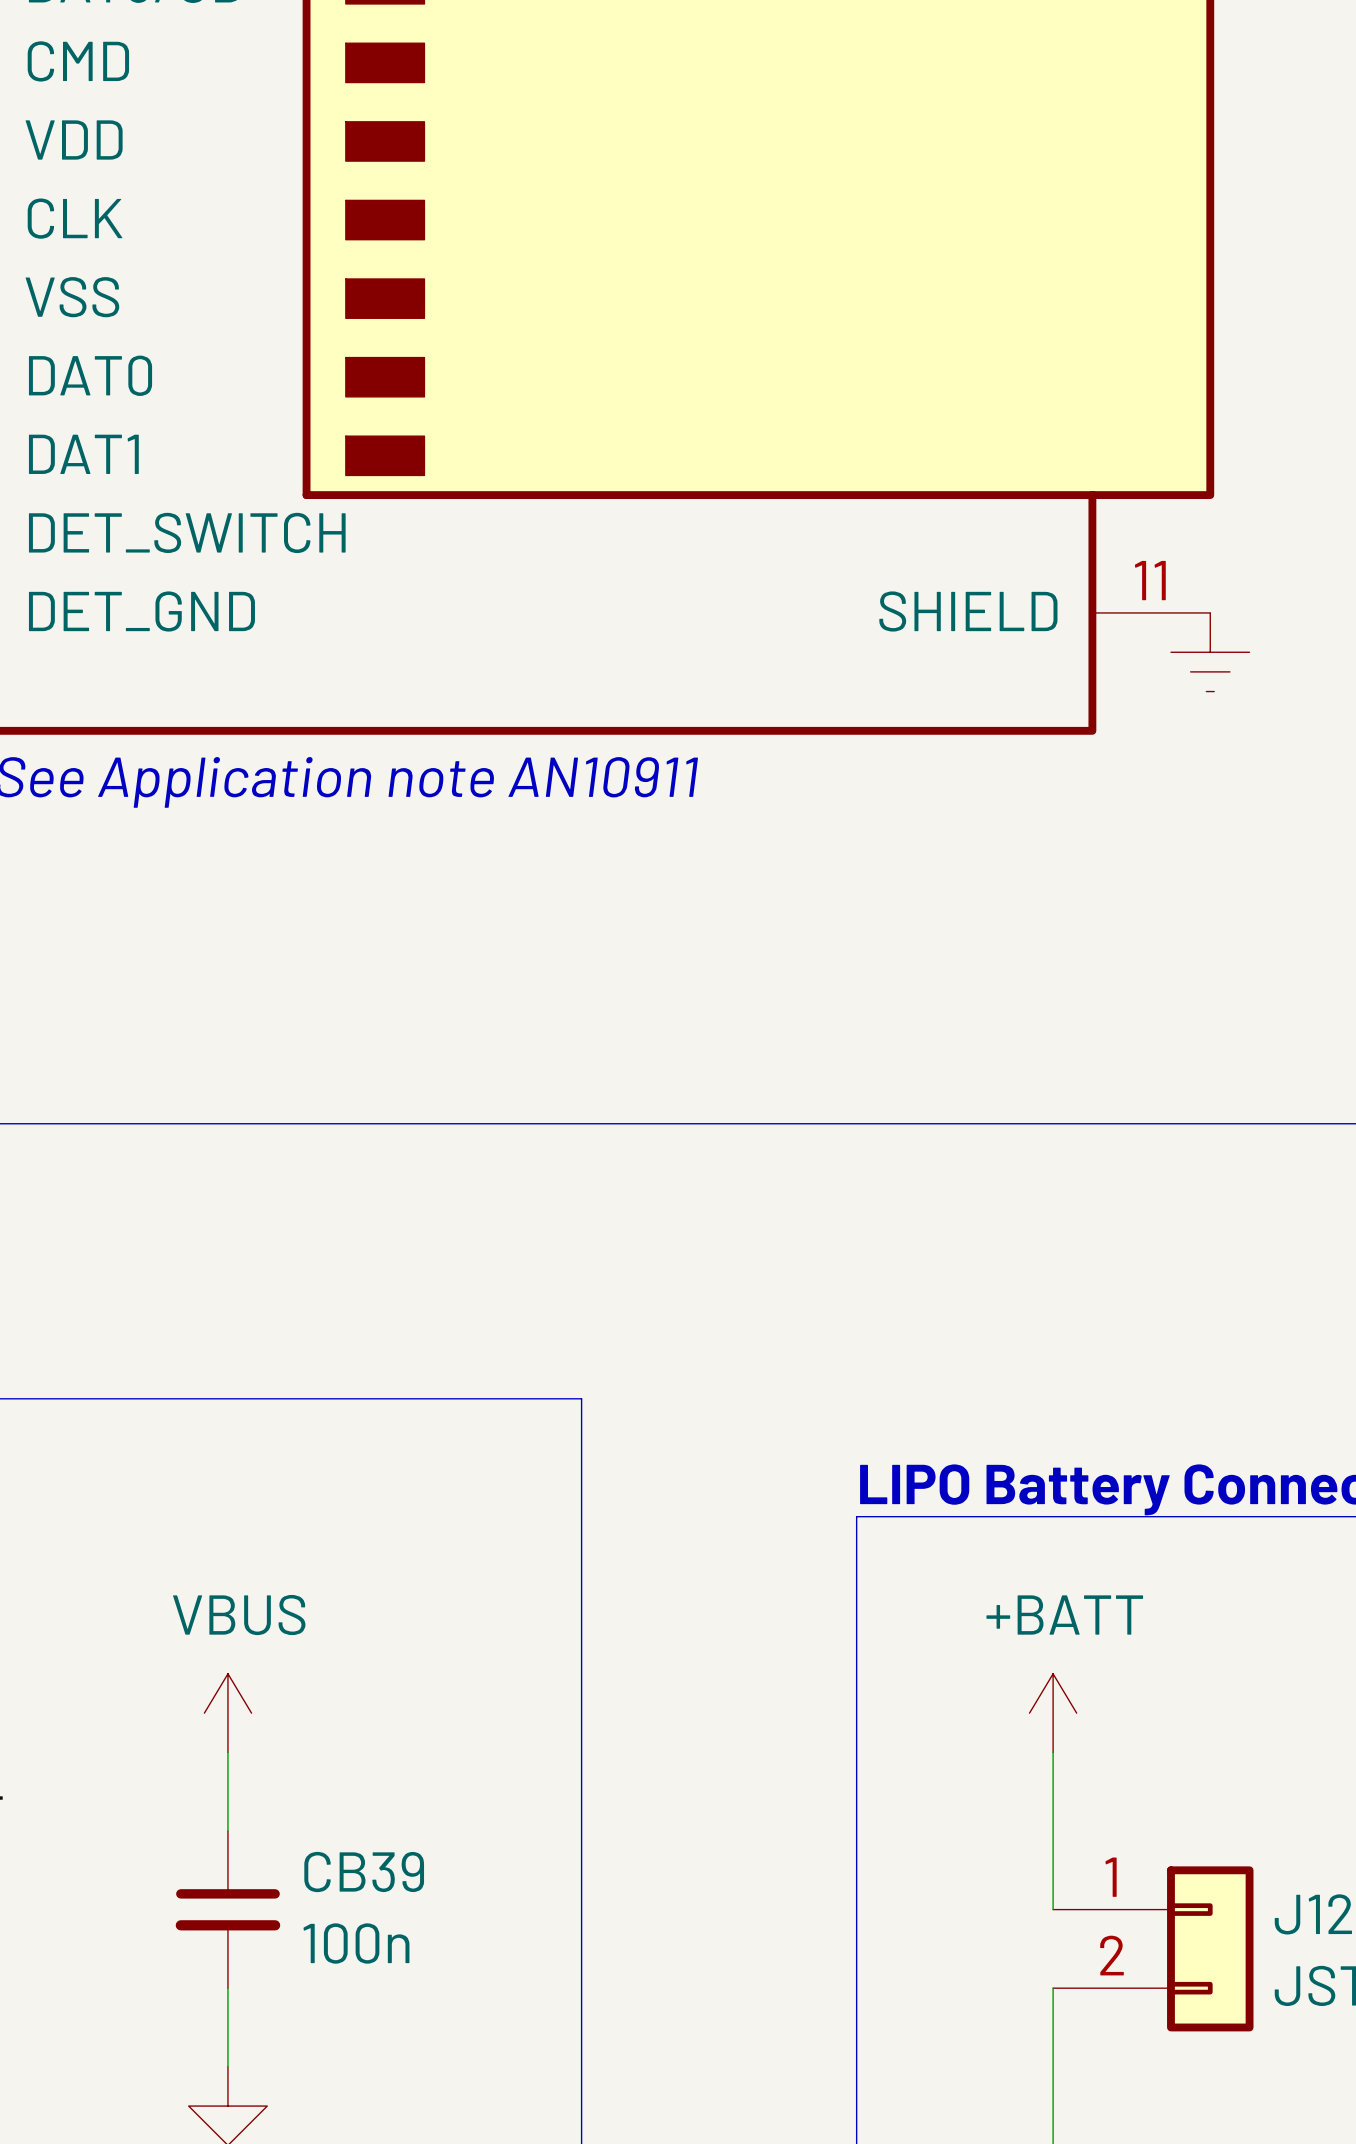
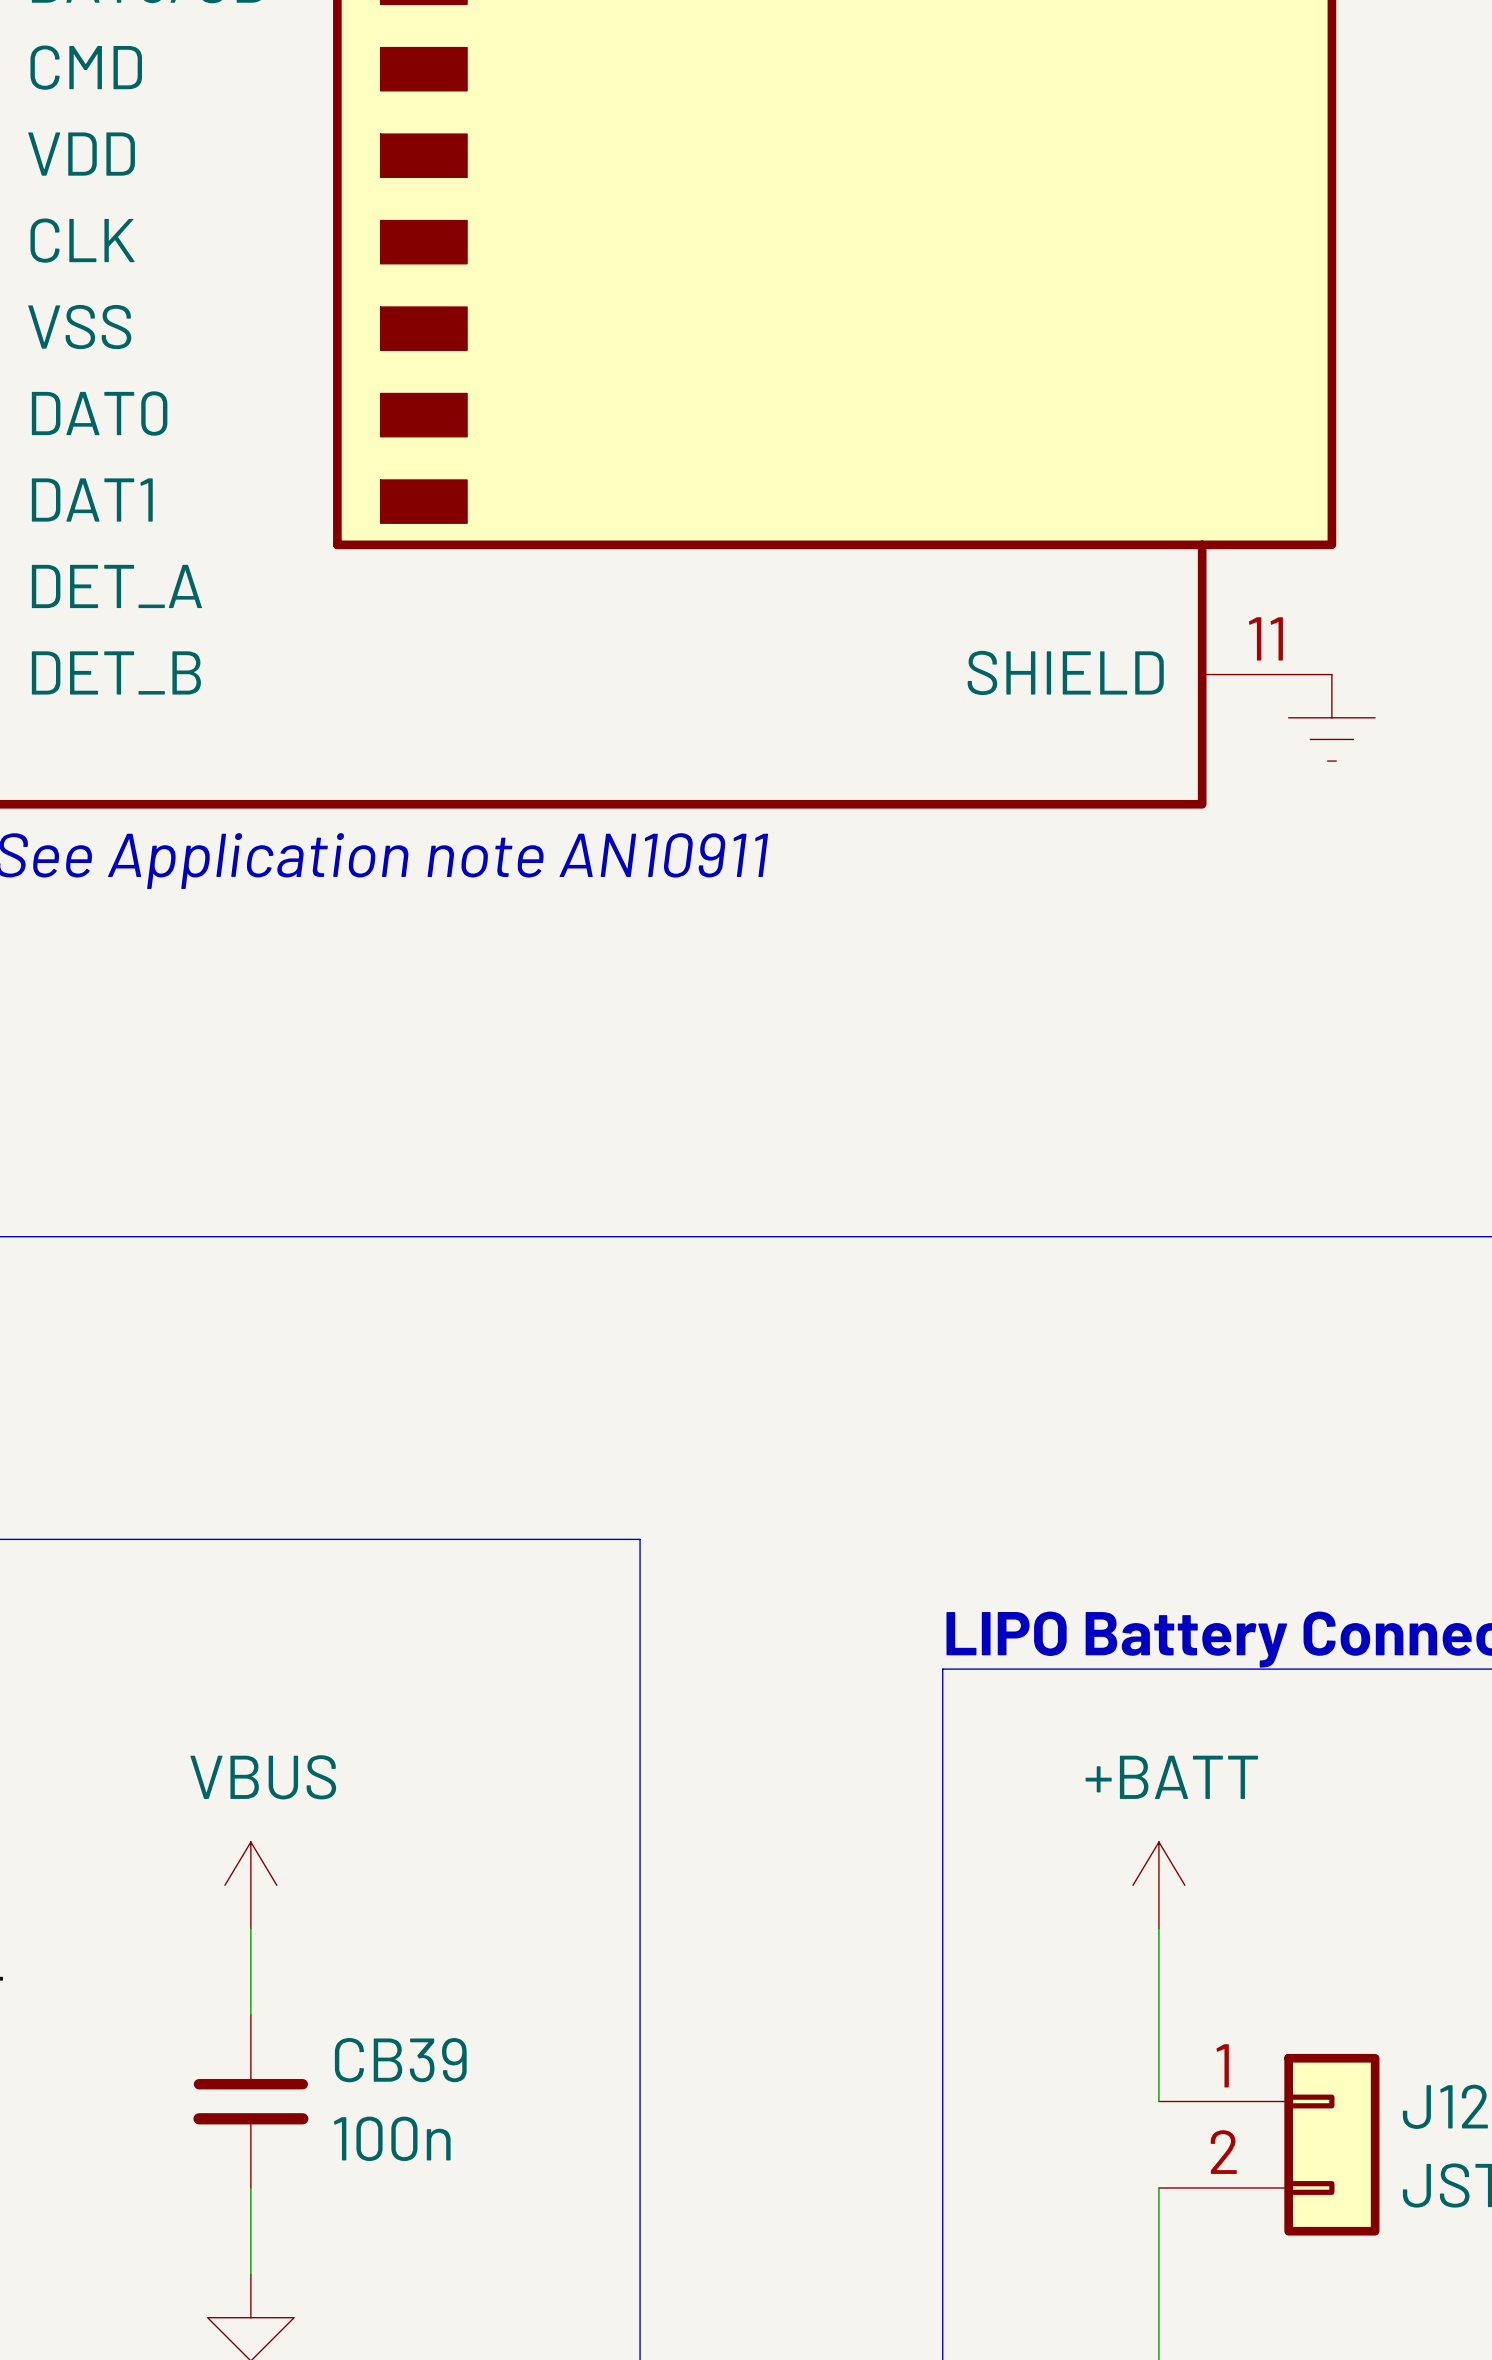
part pin name: DET_SWITCH (187, 532) -> DET_A (116, 586)
part pin name: DET_GND (141, 611) -> DET_B (116, 672)

